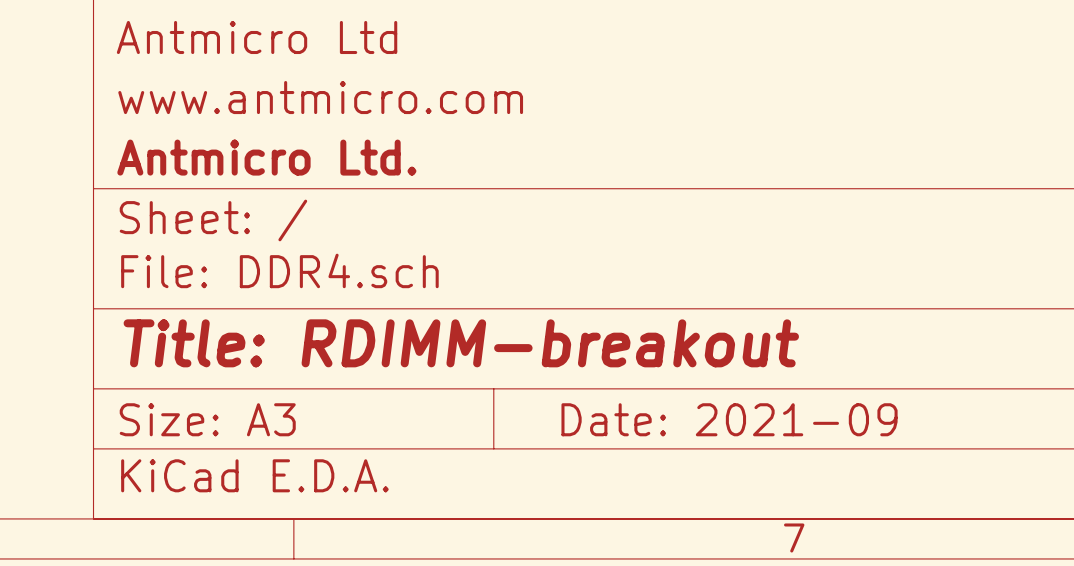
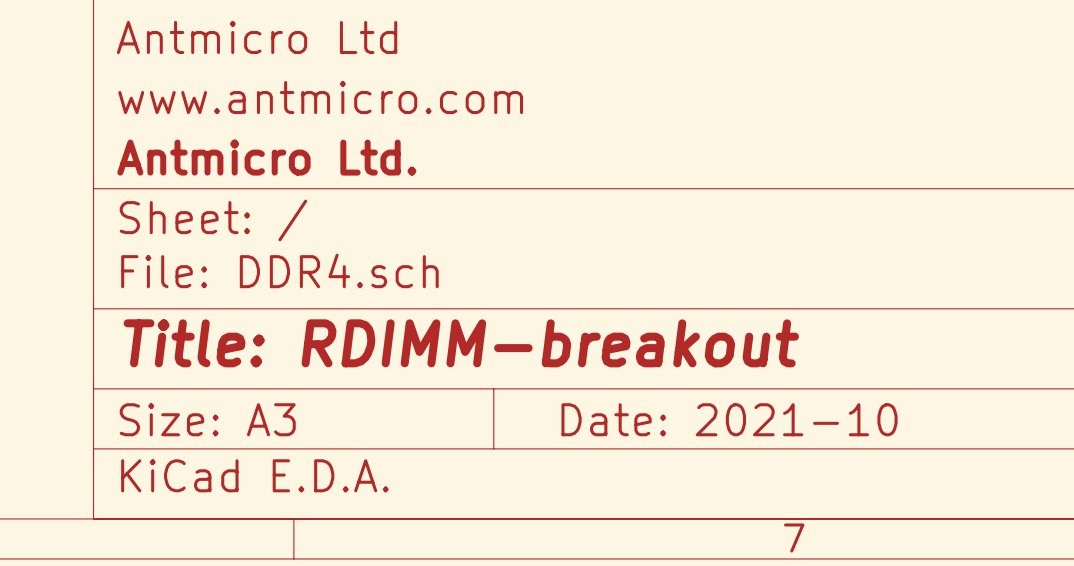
title block: Date: 2021-09 (729, 419) -> Date: 2021-10 (729, 419)

